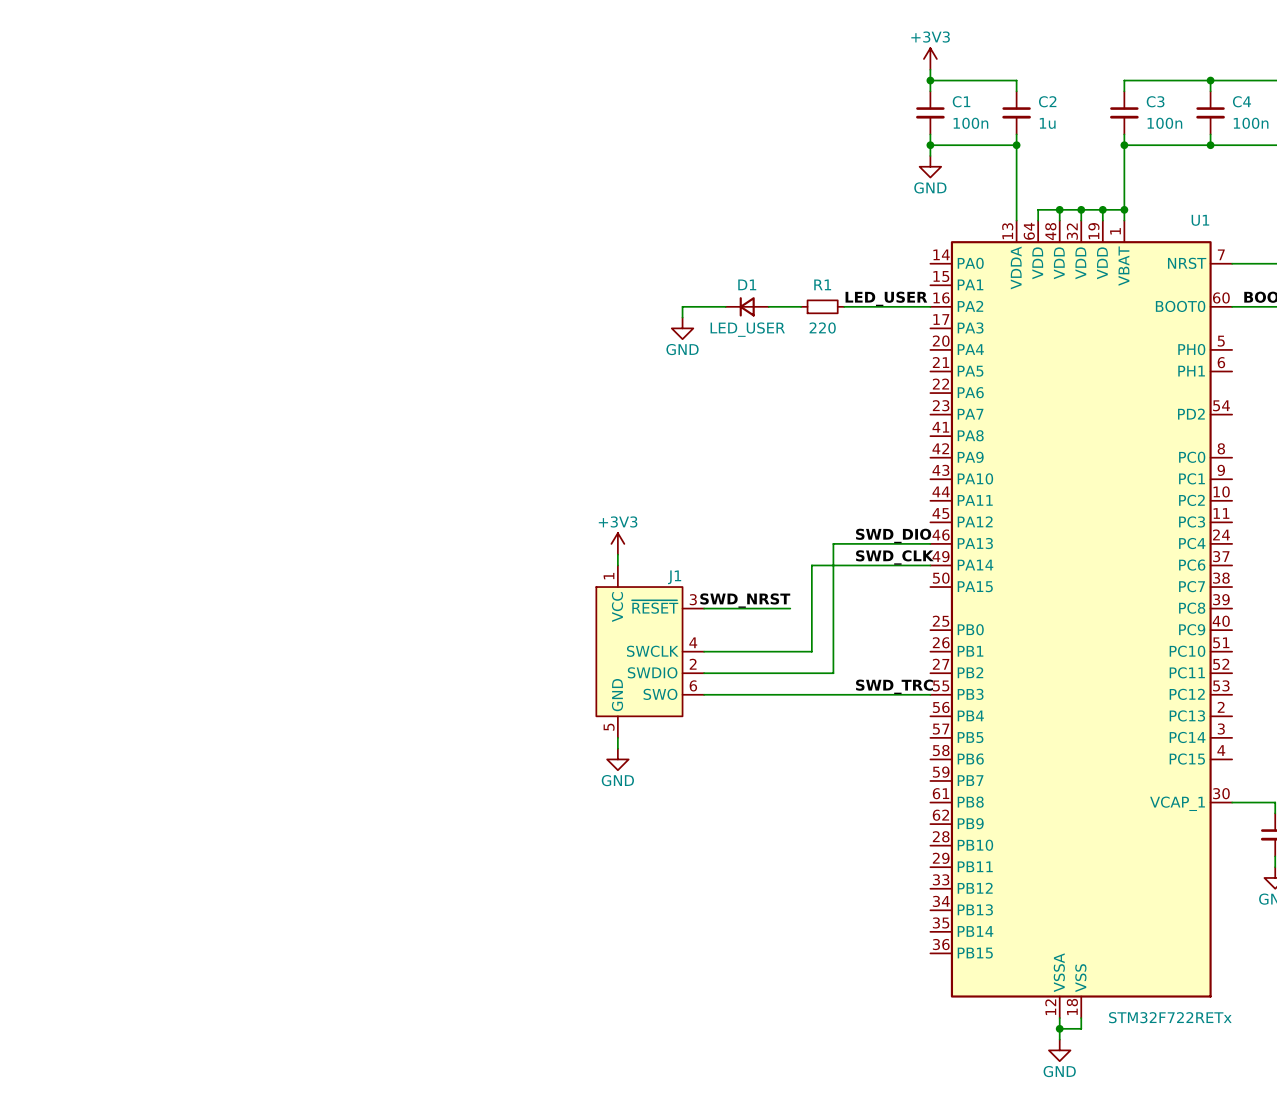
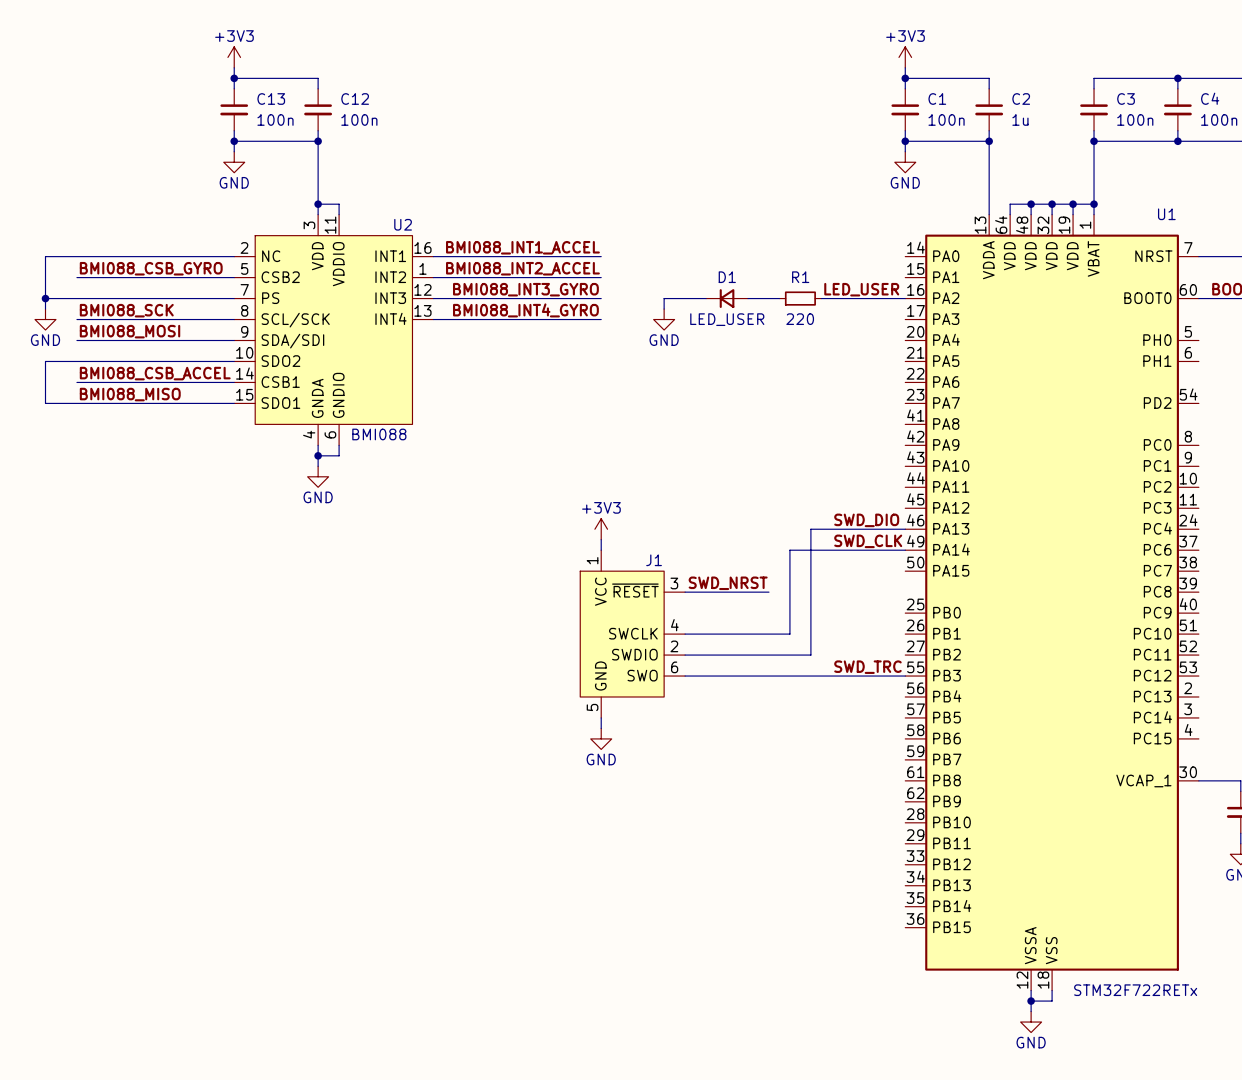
power symbol: none -> +3V3 (234, 57)
wire: none -> (234, 67) (234, 88)
wire: none -> (234, 78) (318, 78) (318, 88)
junction: none -> (234, 78)
C13: none -> 100n (234, 109)
C12: none -> 100n (318, 109)
wire: none -> (234, 130) (234, 151)
wire: none -> (318, 130) (318, 214)
wire: none -> (234, 141) (318, 141)
junction: none -> (234, 141)
junction: none -> (318, 141)
power symbol: none -> GND (234, 162)
wire: none -> (318, 204) (339, 204) (339, 214)
junction: none -> (318, 204)
label: none -> BMI088_INT1_ACCEL (522, 247)
wire: none -> (234, 256) (45, 256) (45, 309)
wire: none -> (433, 256) (601, 256)
label: none -> BMI088_CSB_GYRO (151, 268)
label: none -> BMI088_INT2_ACCEL (522, 268)
wire: none -> (76, 277) (234, 277)
wire: none -> (433, 277) (601, 277)
label: none -> BMI088_INT3_GYRO (525, 289)
wire: none -> (45, 298) (234, 298)
junction: none -> (45, 298)
wire: none -> (433, 298) (601, 298)
label: none -> BMI088_SCK (126, 310)
label: none -> BMI088_INT4_GYRO (525, 310)
power symbol: none -> GND (45, 319)
wire: none -> (76, 319) (234, 319)
wire: none -> (433, 319) (601, 319)
U2: none -> BMI088 (333, 330)
label: none -> BMI088_MOSI (130, 331)
wire: none -> (76, 340) (234, 340)
wire: none -> (234, 361) (45, 361) (45, 403) (234, 403)
label: none -> BMI088_CSB_ACCEL (155, 373)
wire: none -> (76, 382) (234, 382)
label: none -> BMI088_MISO (130, 394)
wire: none -> (318, 445) (318, 466)
wire: none -> (339, 445) (339, 455) (318, 455)
junction: none -> (318, 455)
power symbol: none -> GND (318, 476)

